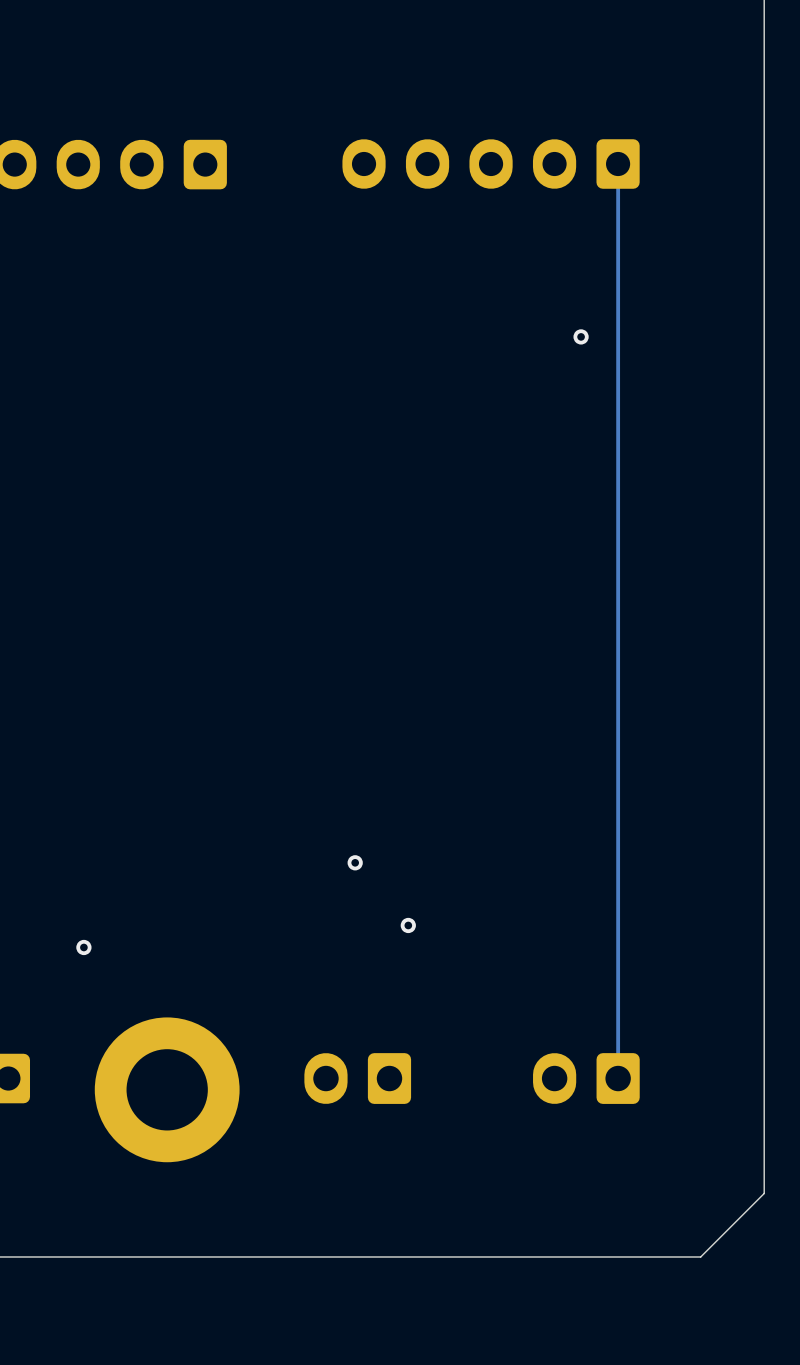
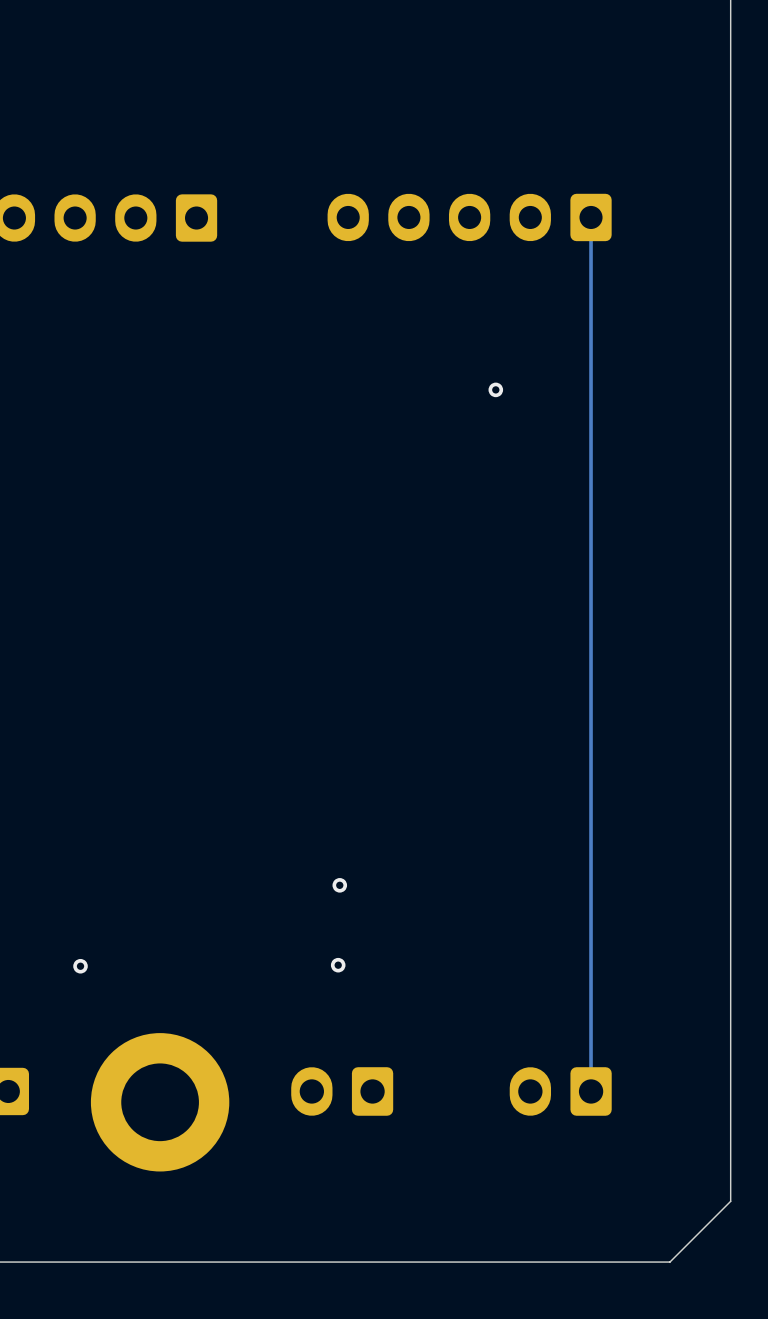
via position: (581, 336) -> (495, 389)
via position: (408, 925) -> (338, 965)

